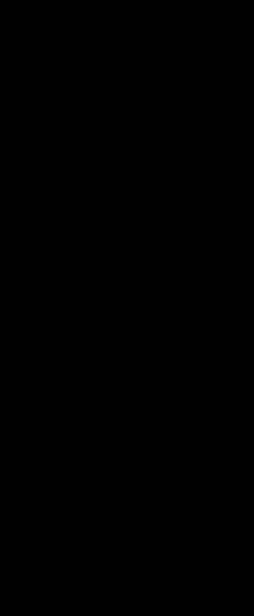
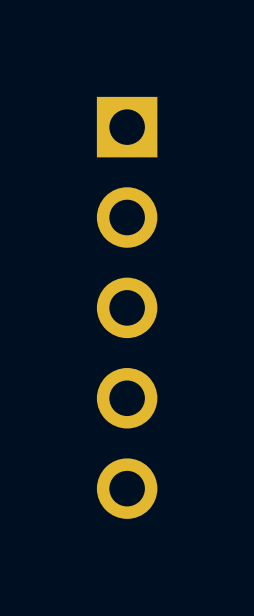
part: none -> (127, 307)

